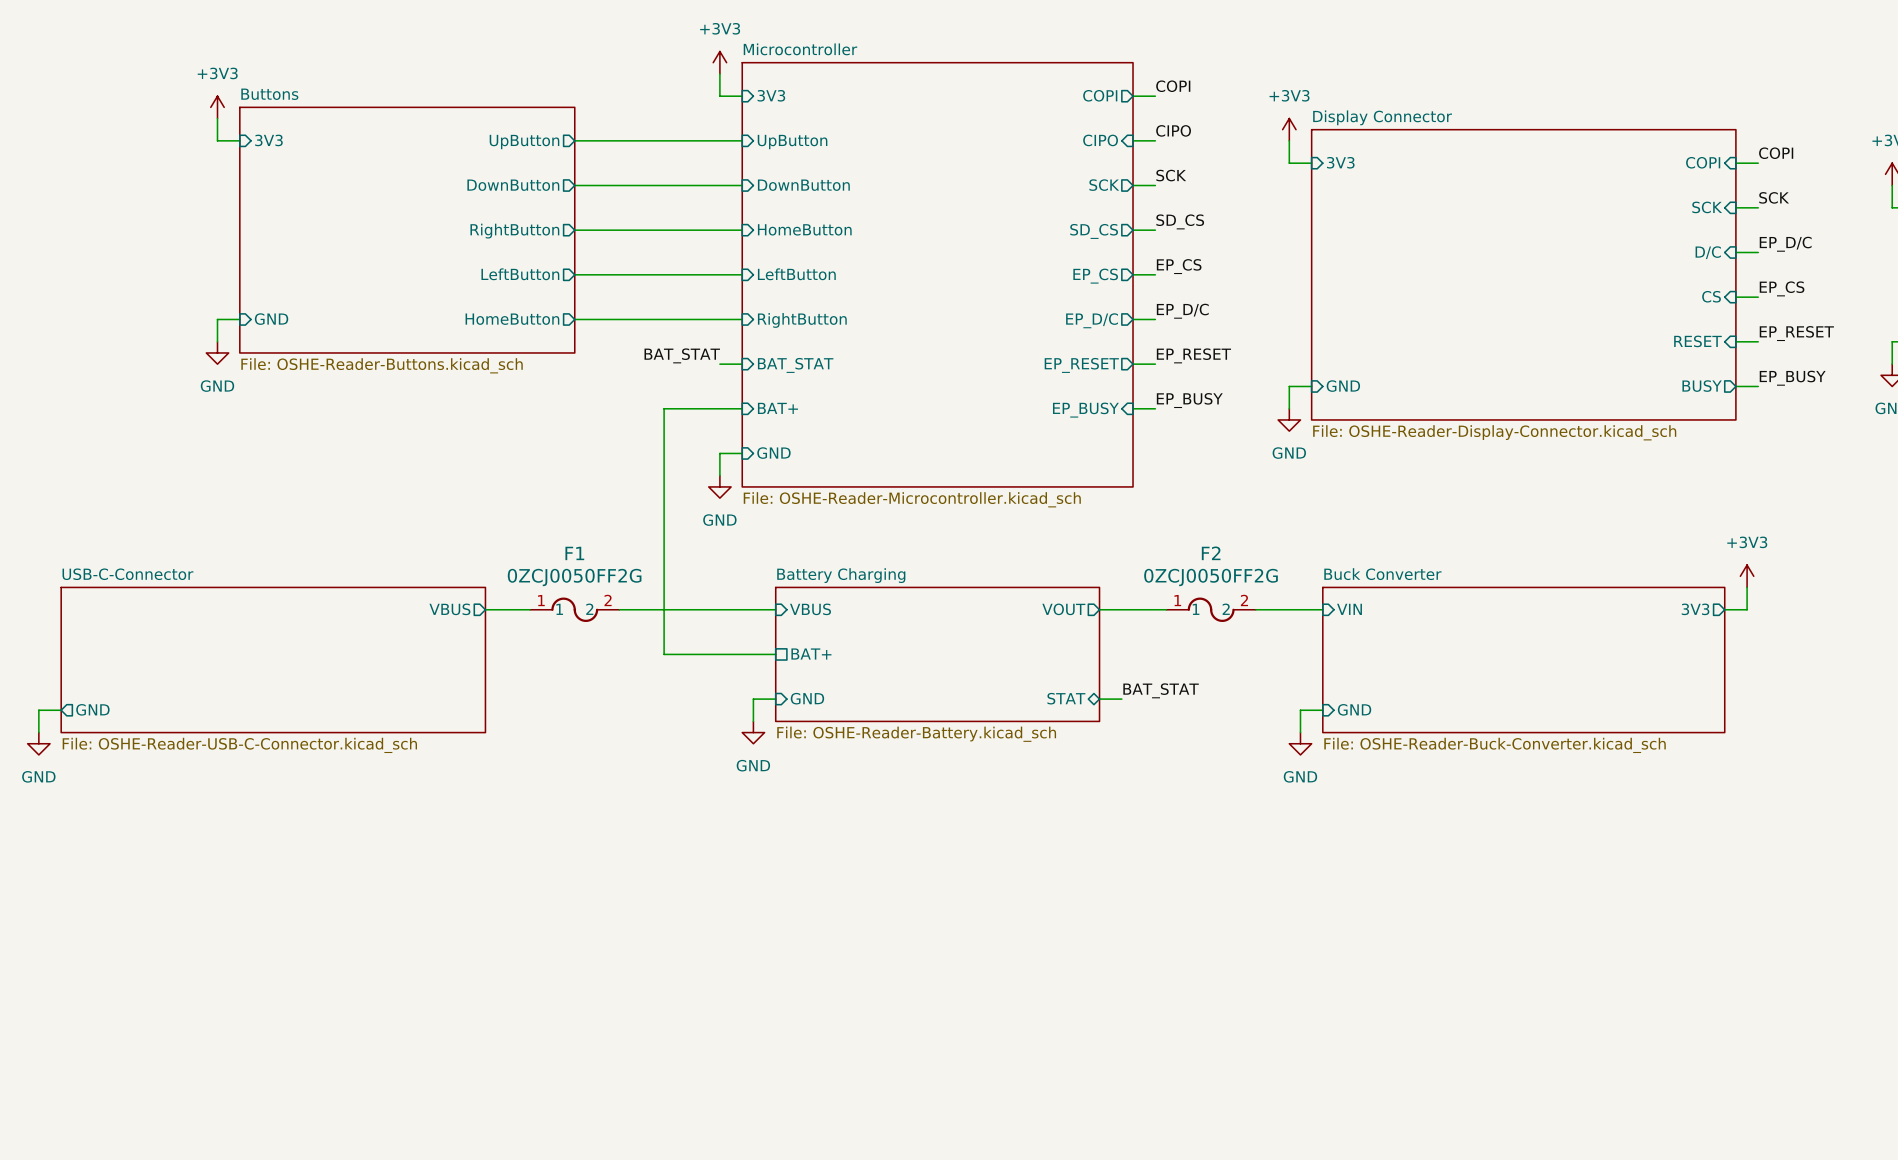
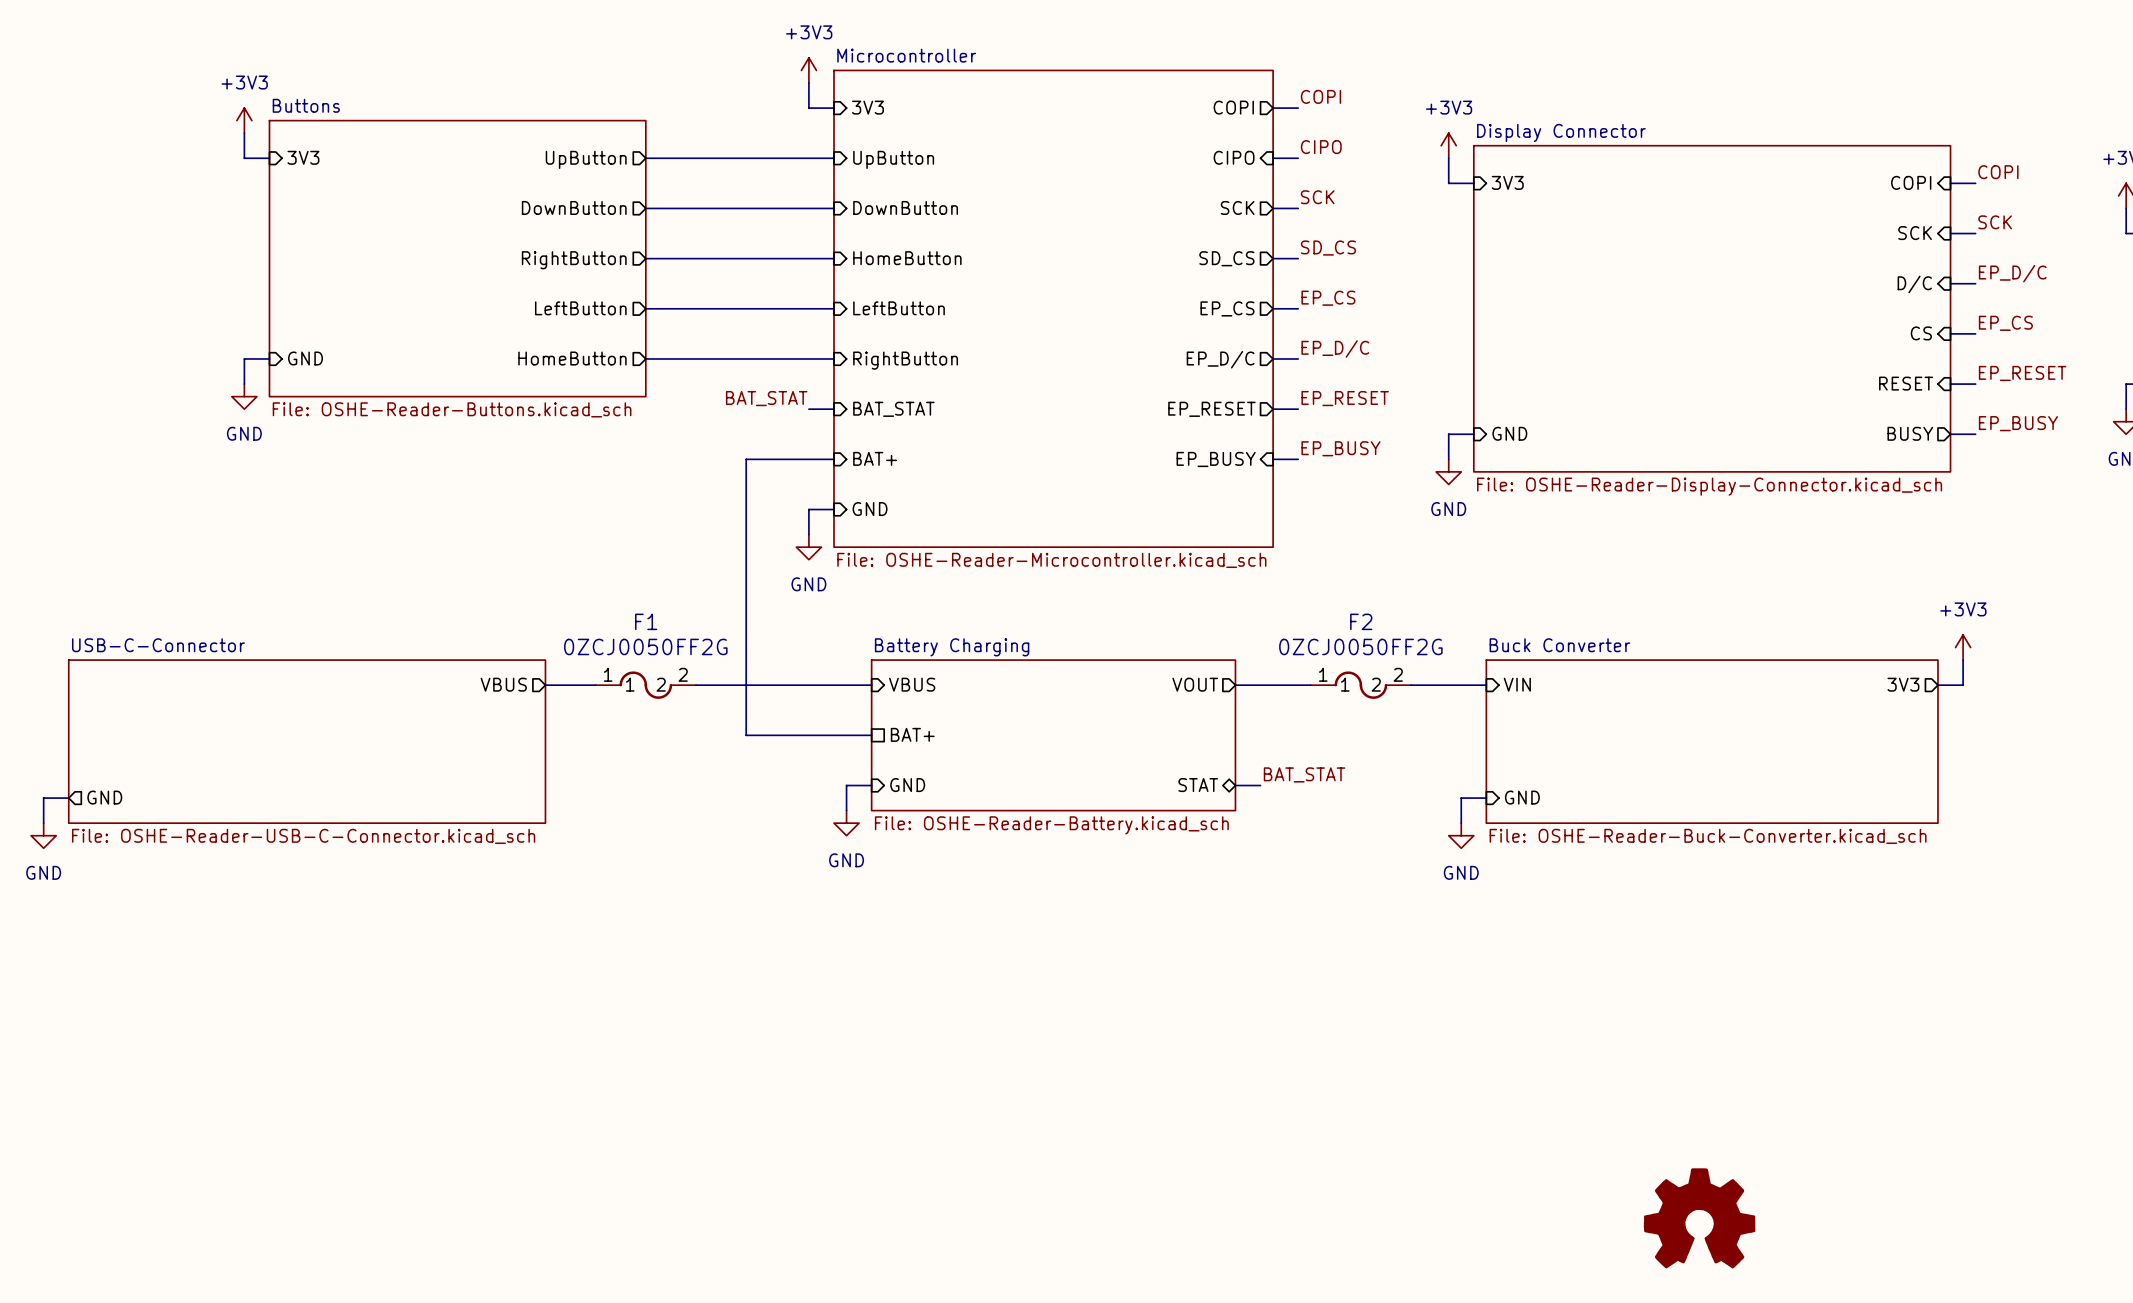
power symbol: none -> (1699, 1218)

